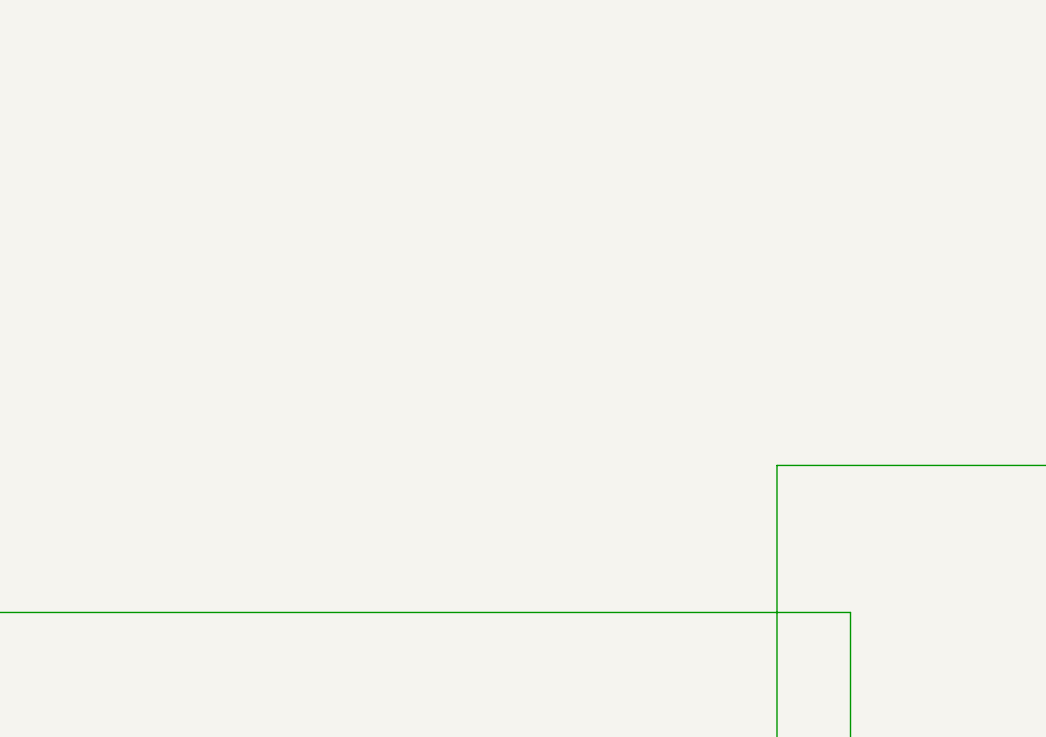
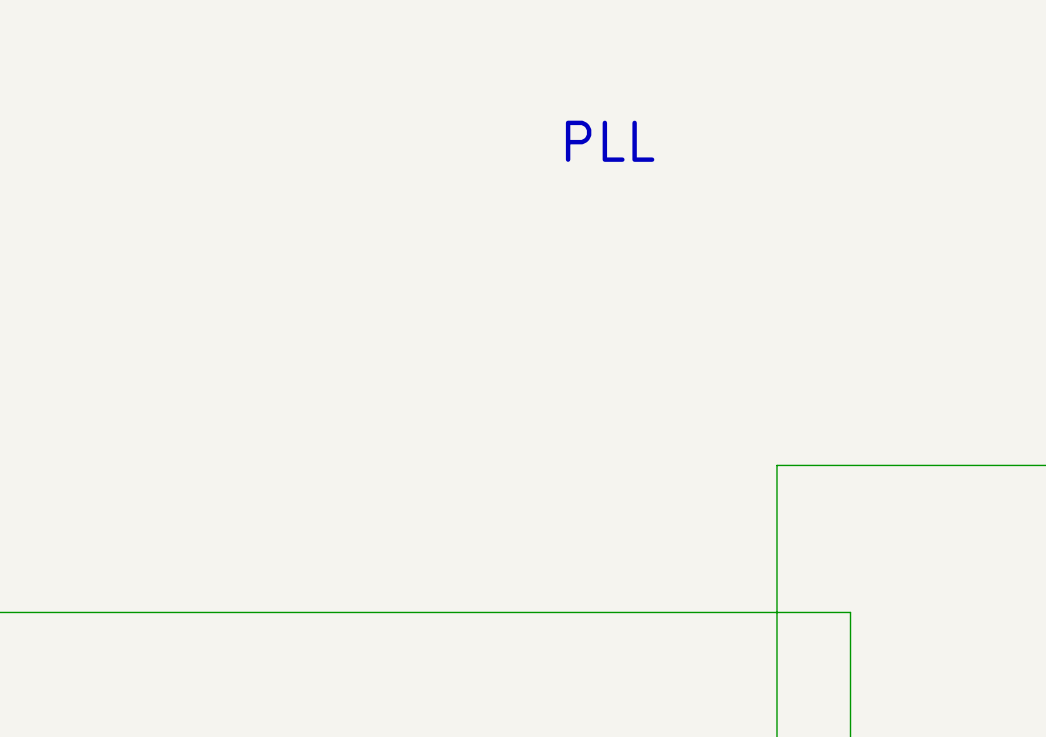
text: none -> PLL (610, 141)

